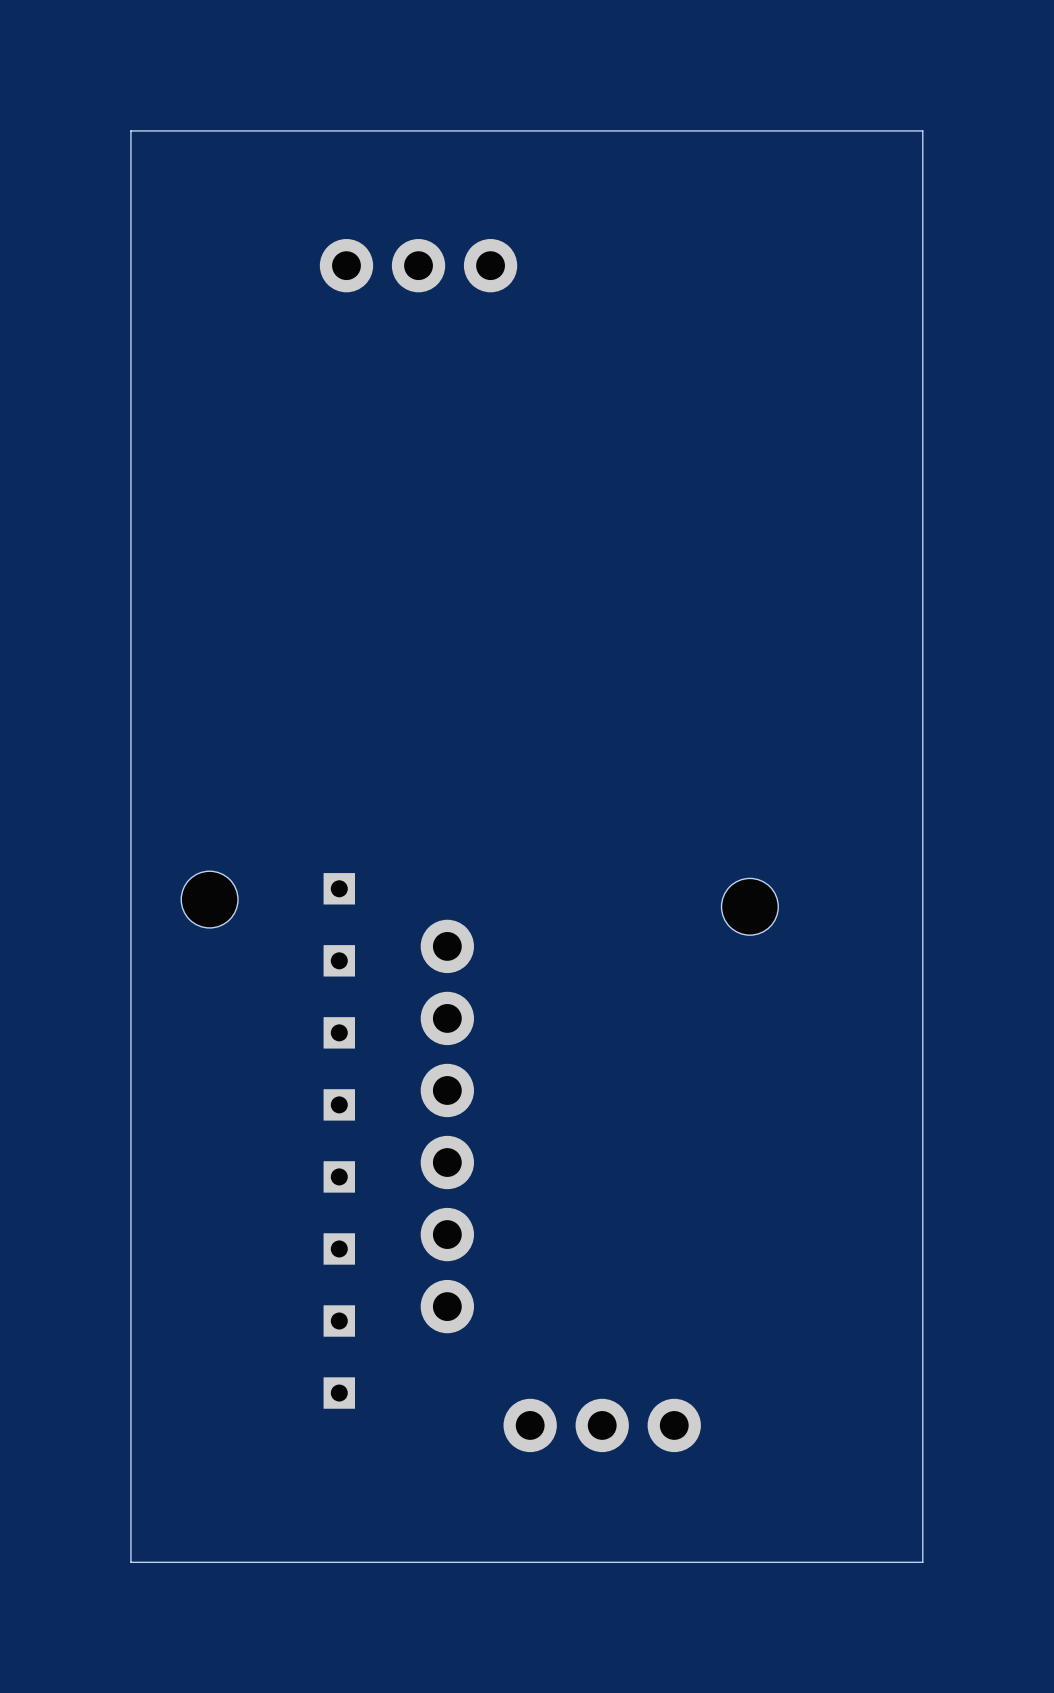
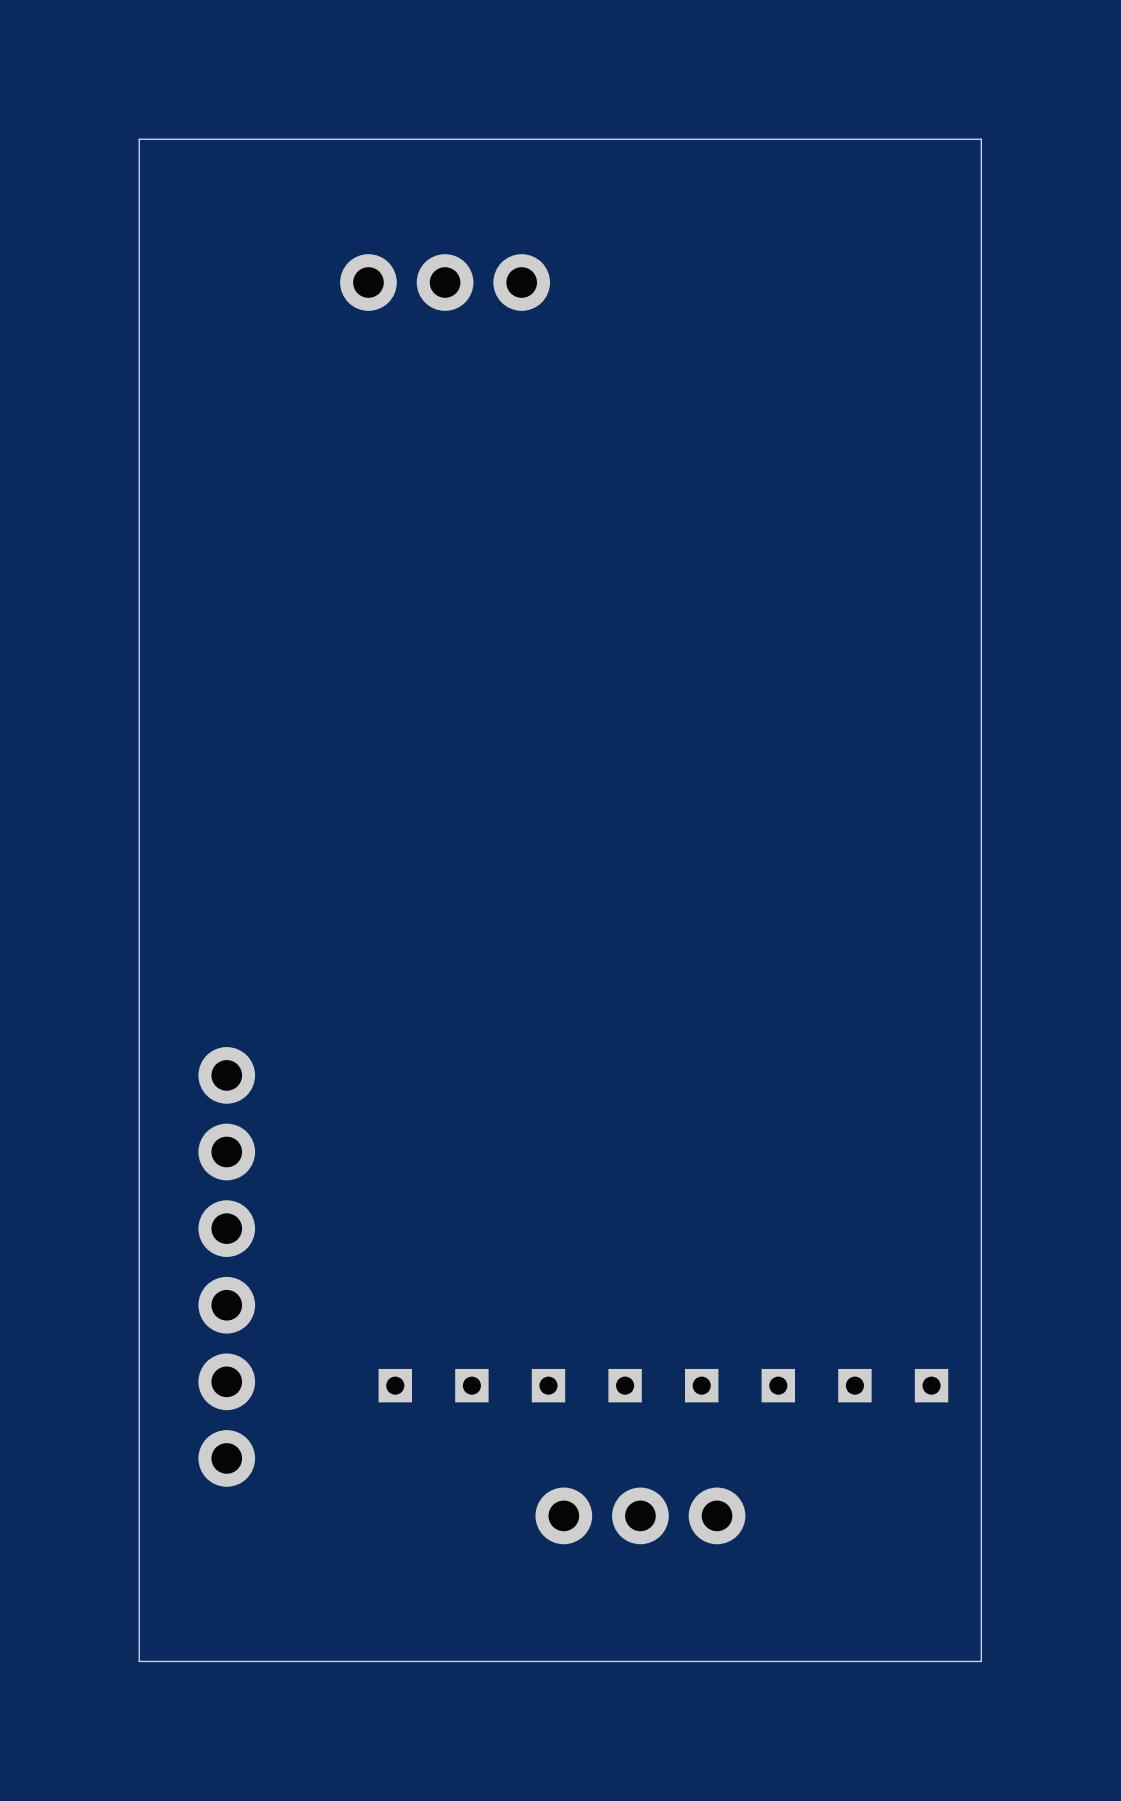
hole: (209, 899) -> none
hole: (749, 906) -> none
part position: (447, 1126) -> (226, 1266)
part rotation: 0° (339, 1140) -> 90° clockwise (663, 1385)
part position: (339, 1140) -> (663, 1385)

